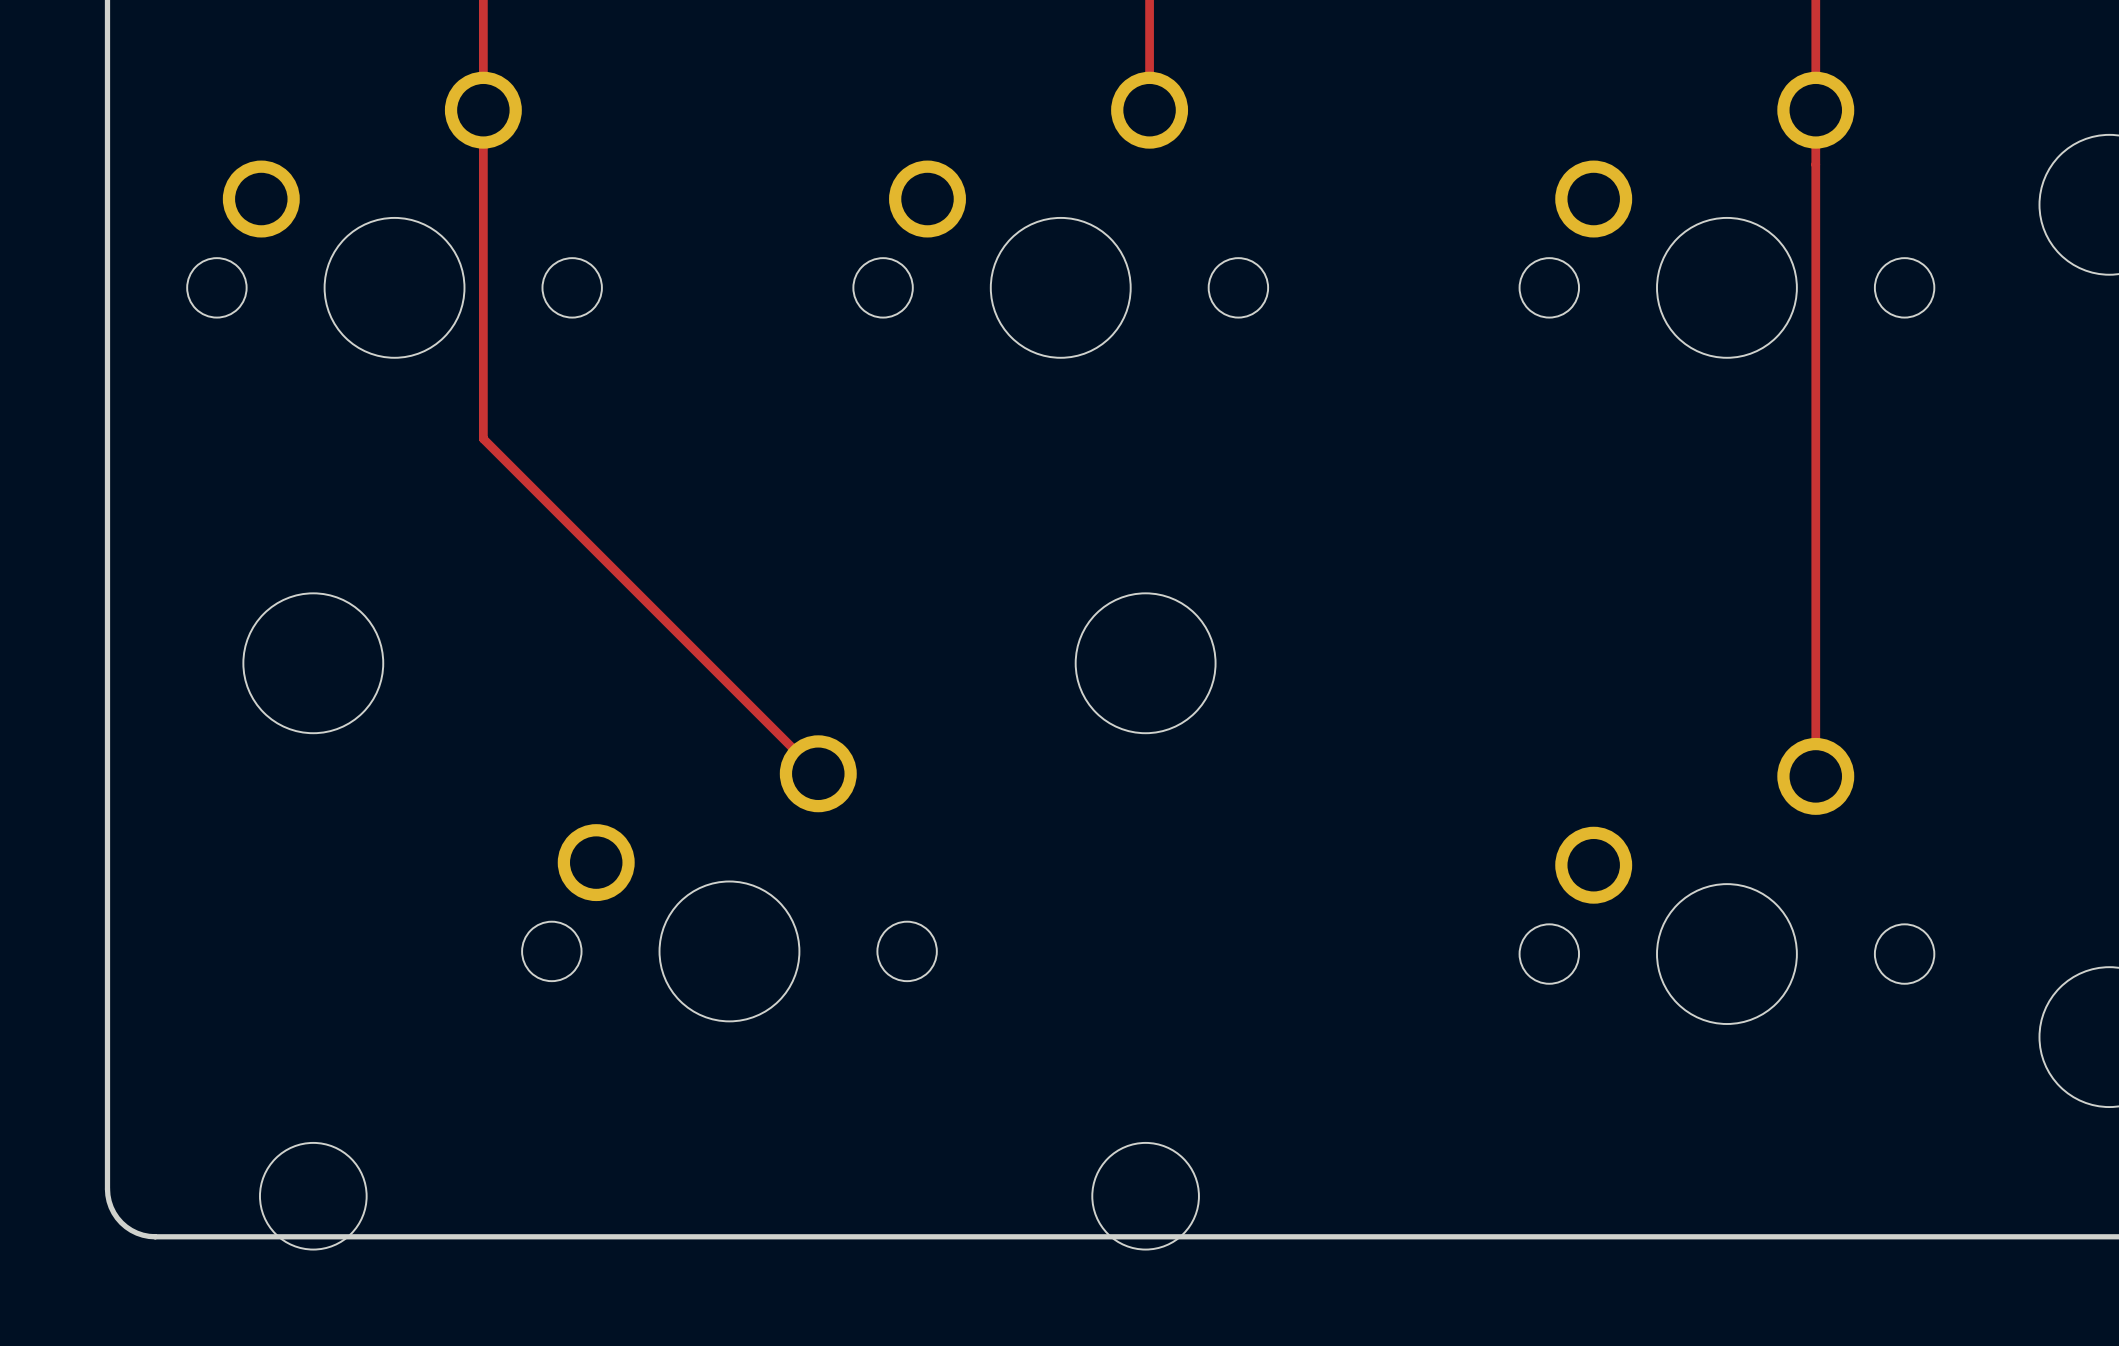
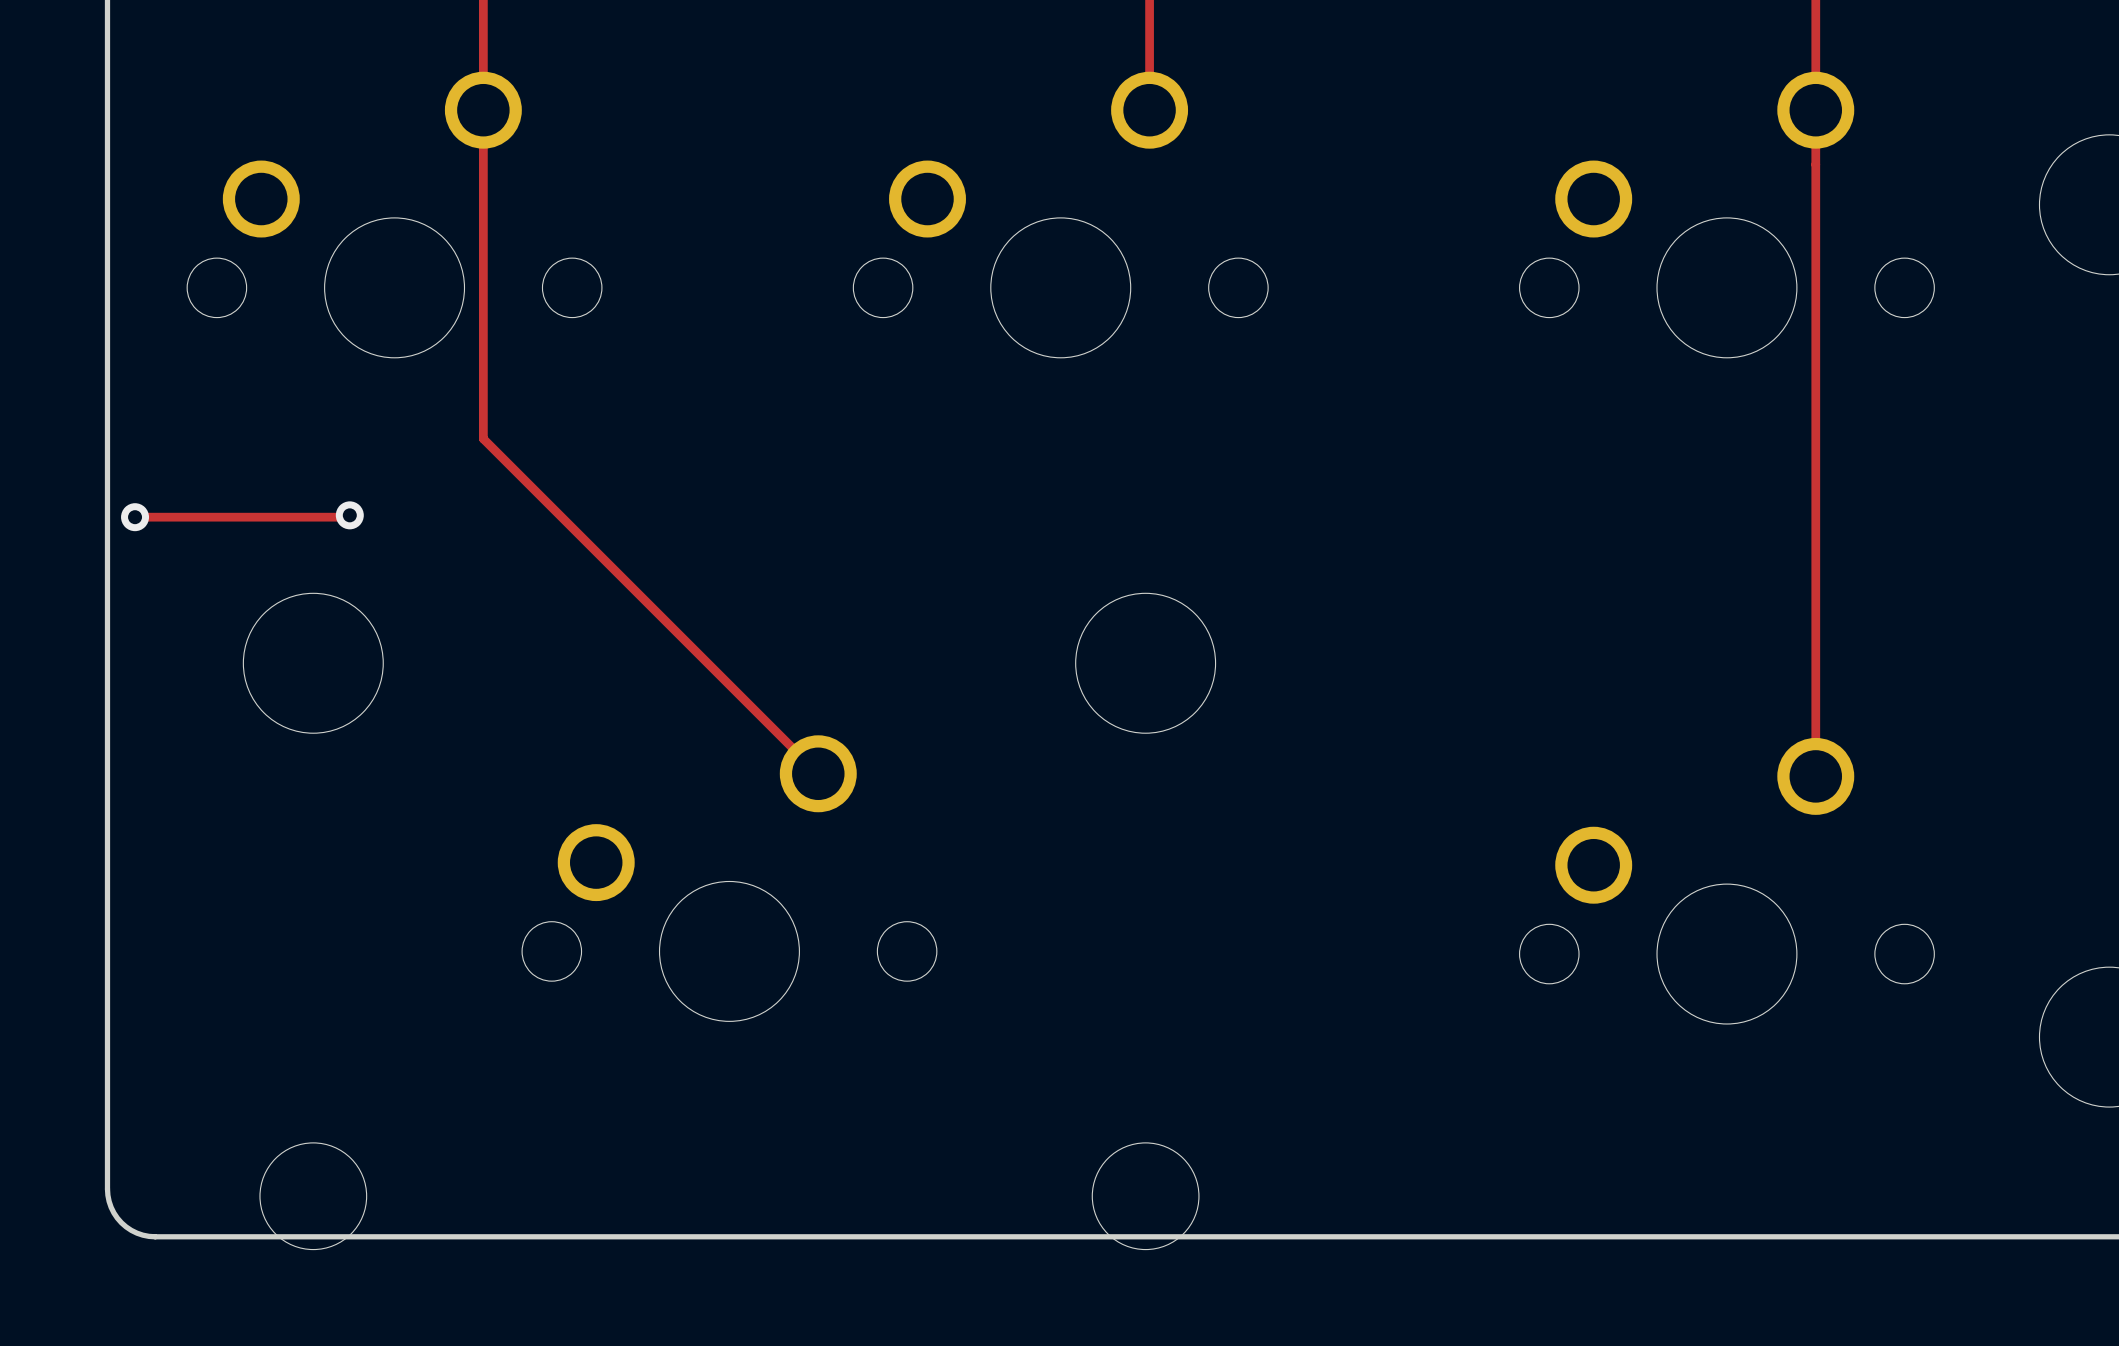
track: none -> (349, 515) (347, 517) (135, 517)
via: none -> (349, 515)
via: none -> (135, 517)

